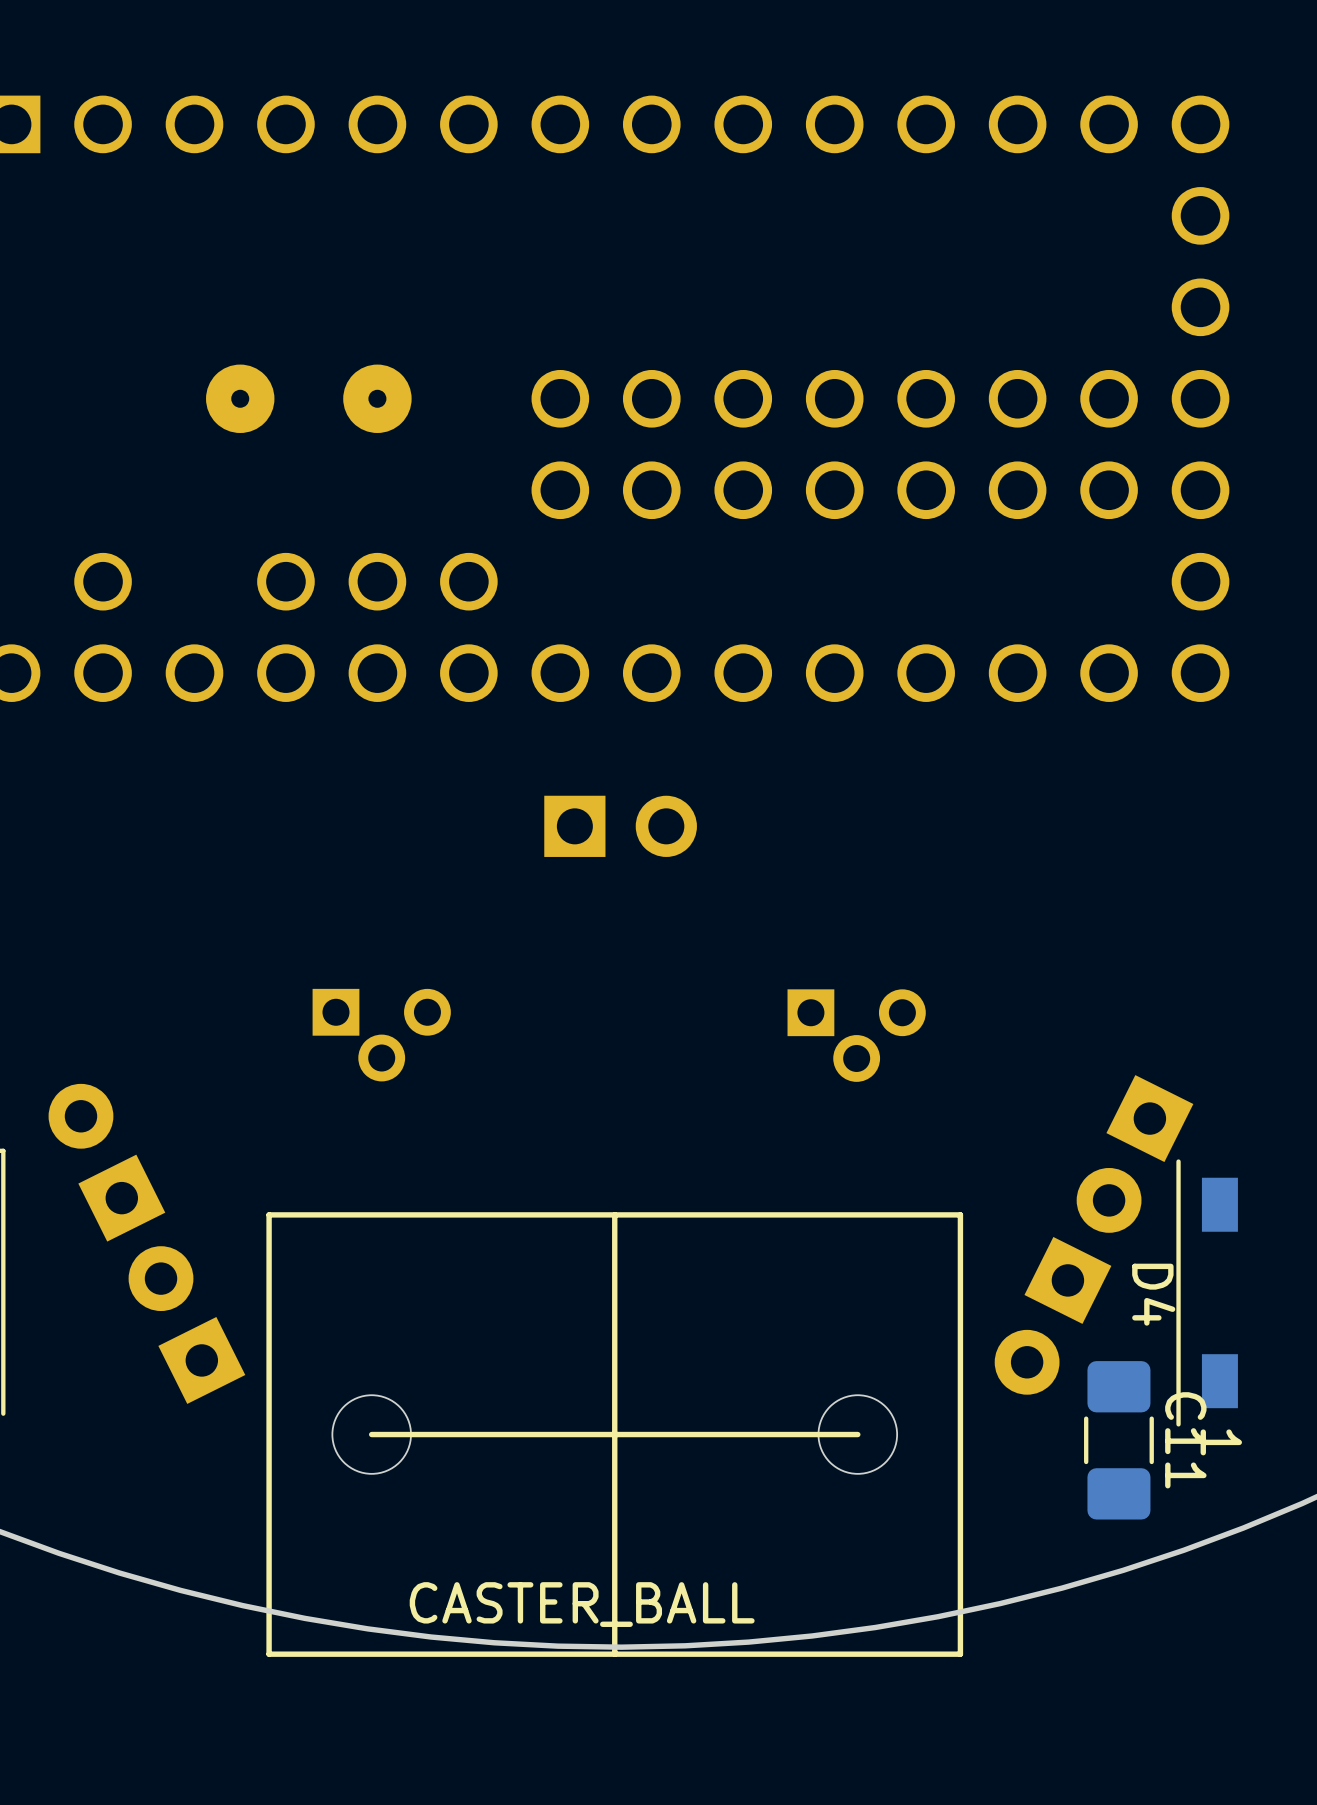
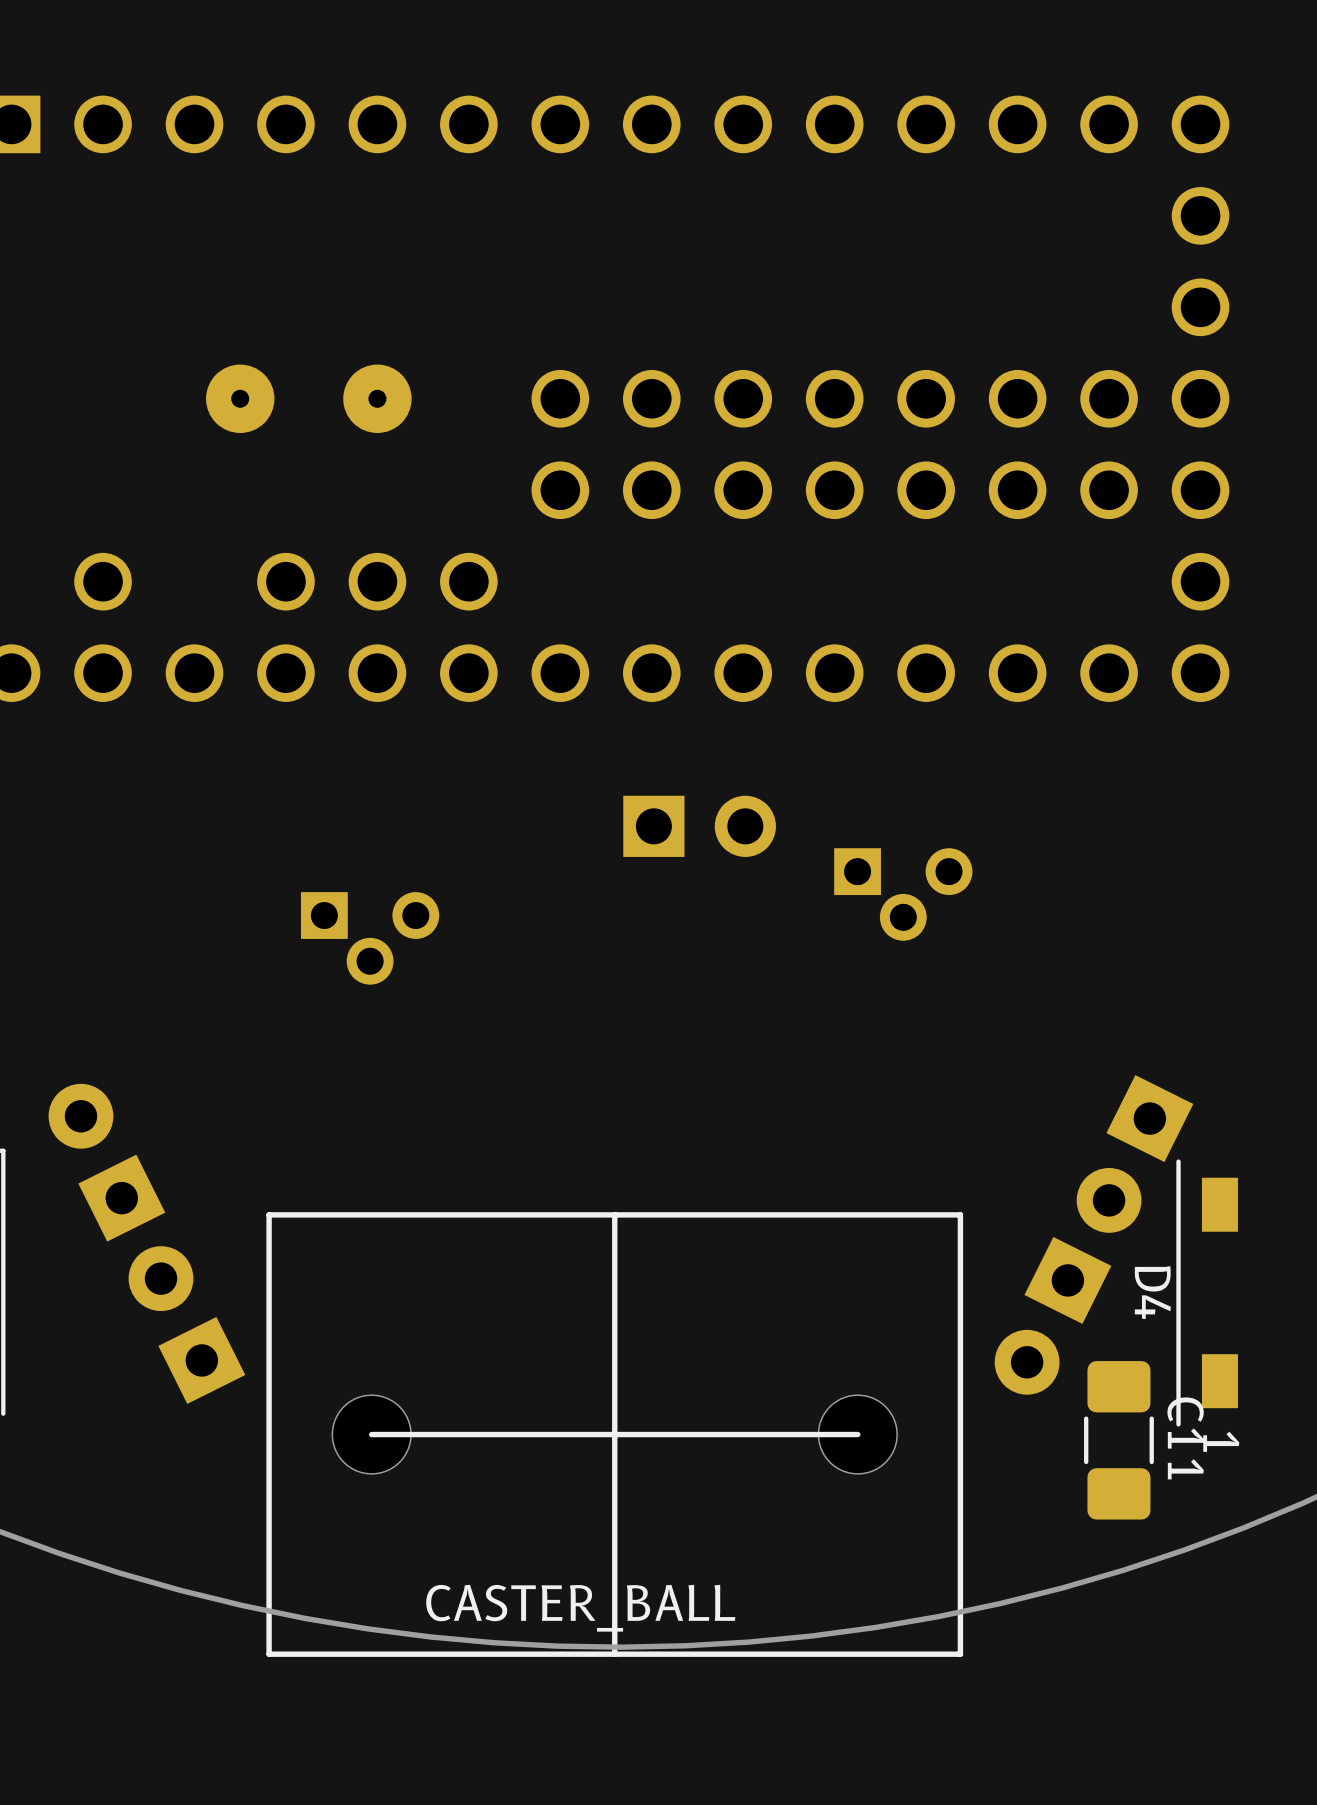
part position: (620, 826) -> (699, 826)
part position: (381, 1035) -> (370, 938)
part position: (856, 1035) -> (903, 894)

